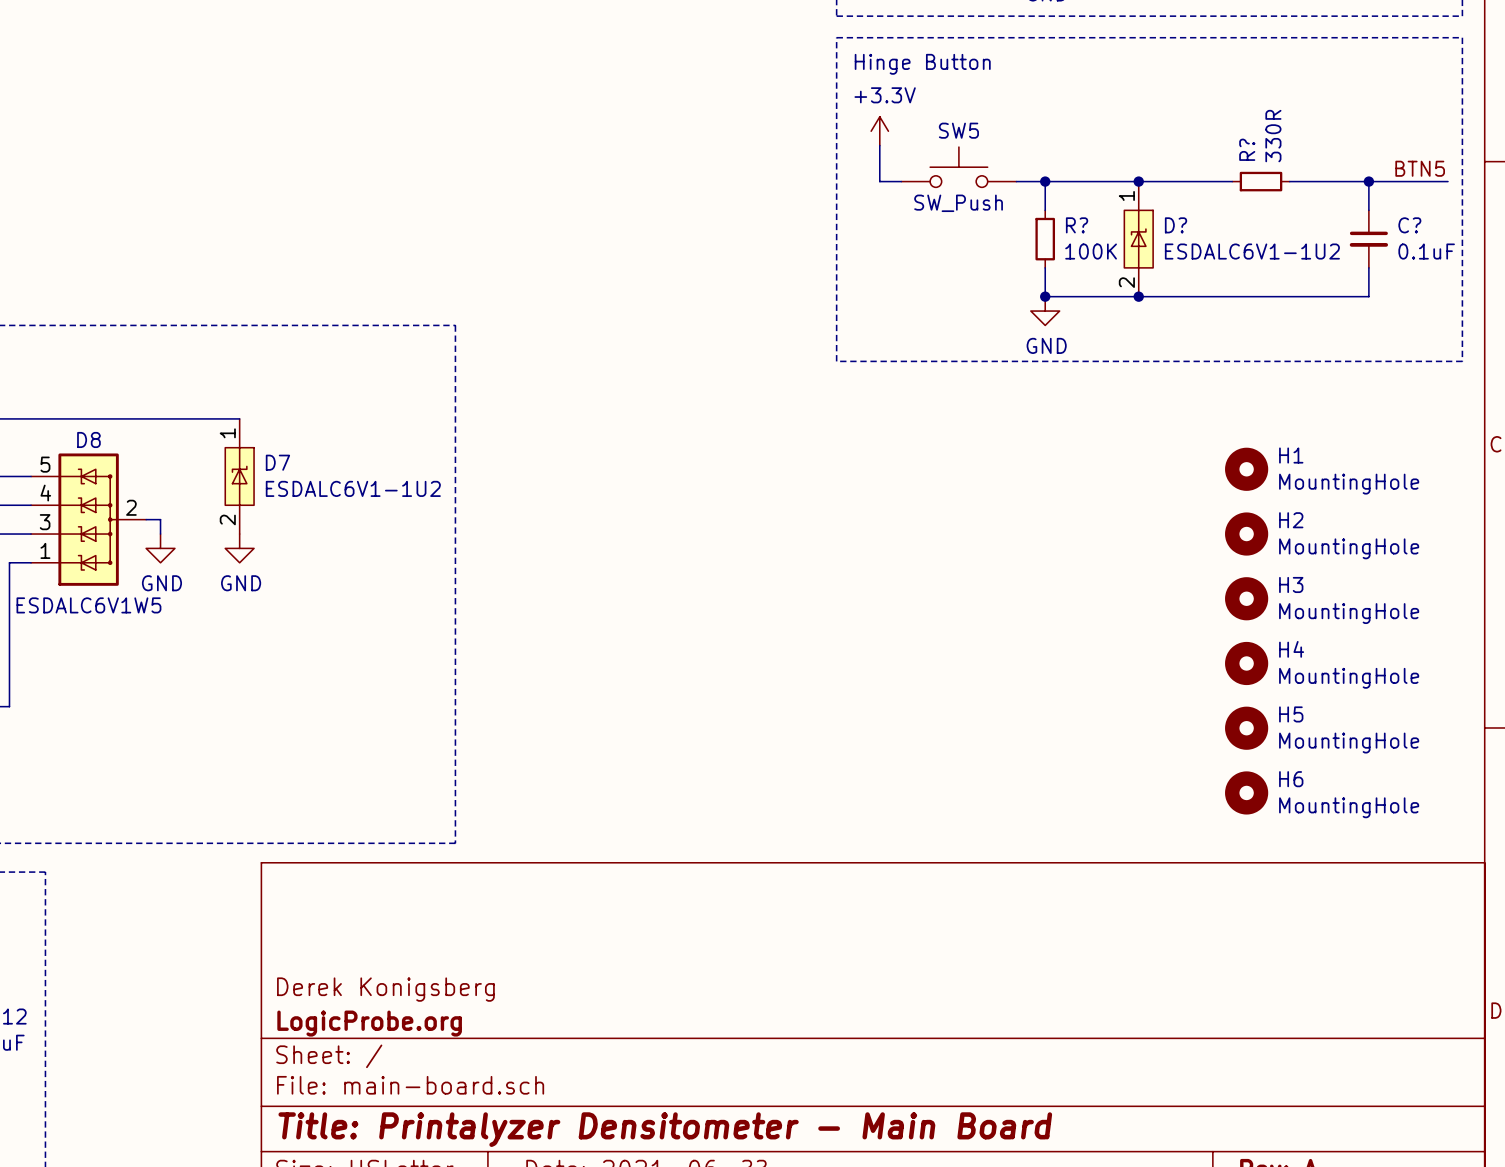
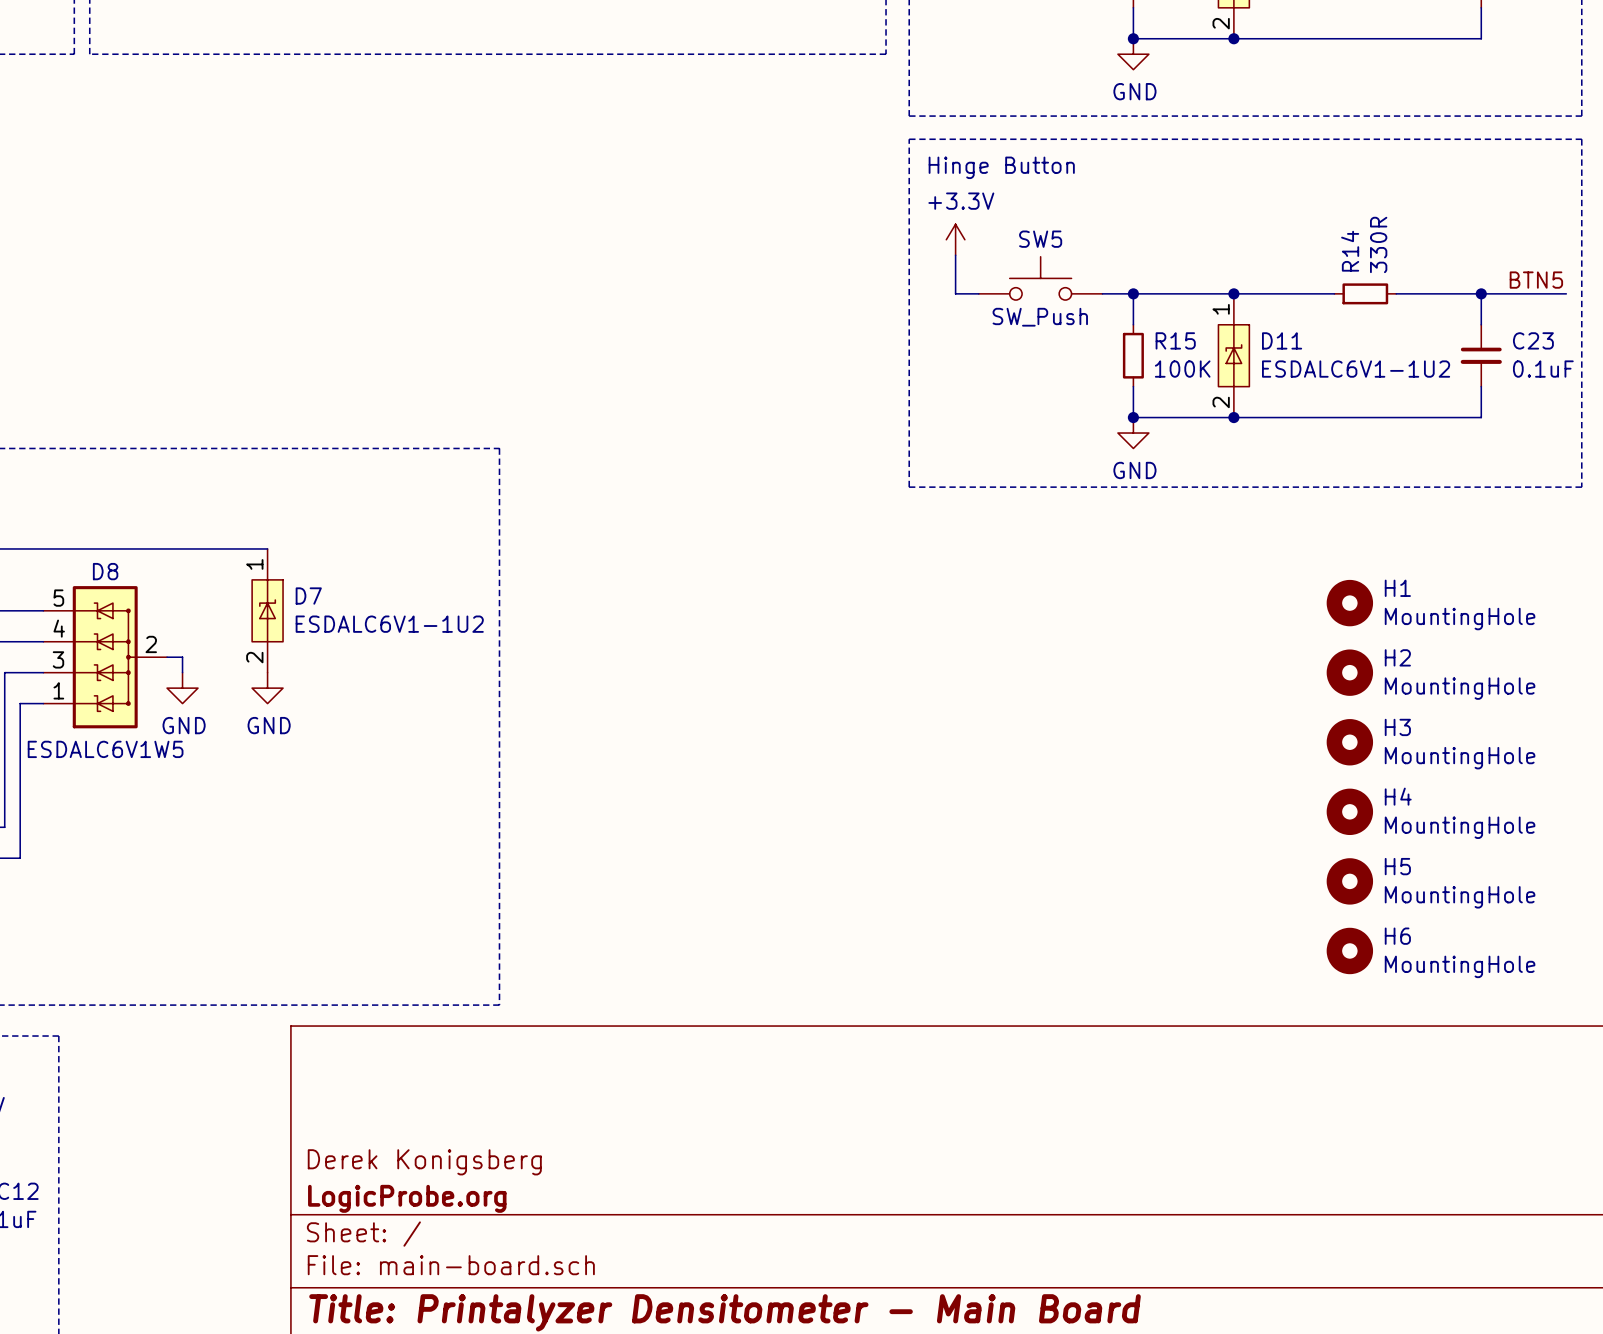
R? name: R? (1247, 149) -> R14 (1350, 251)
R? name: R? (1077, 225) -> R15 (1175, 340)
D? name: D? (1176, 225) -> D11 (1282, 340)
C? name: C? (1409, 225) -> C23 (1533, 340)

